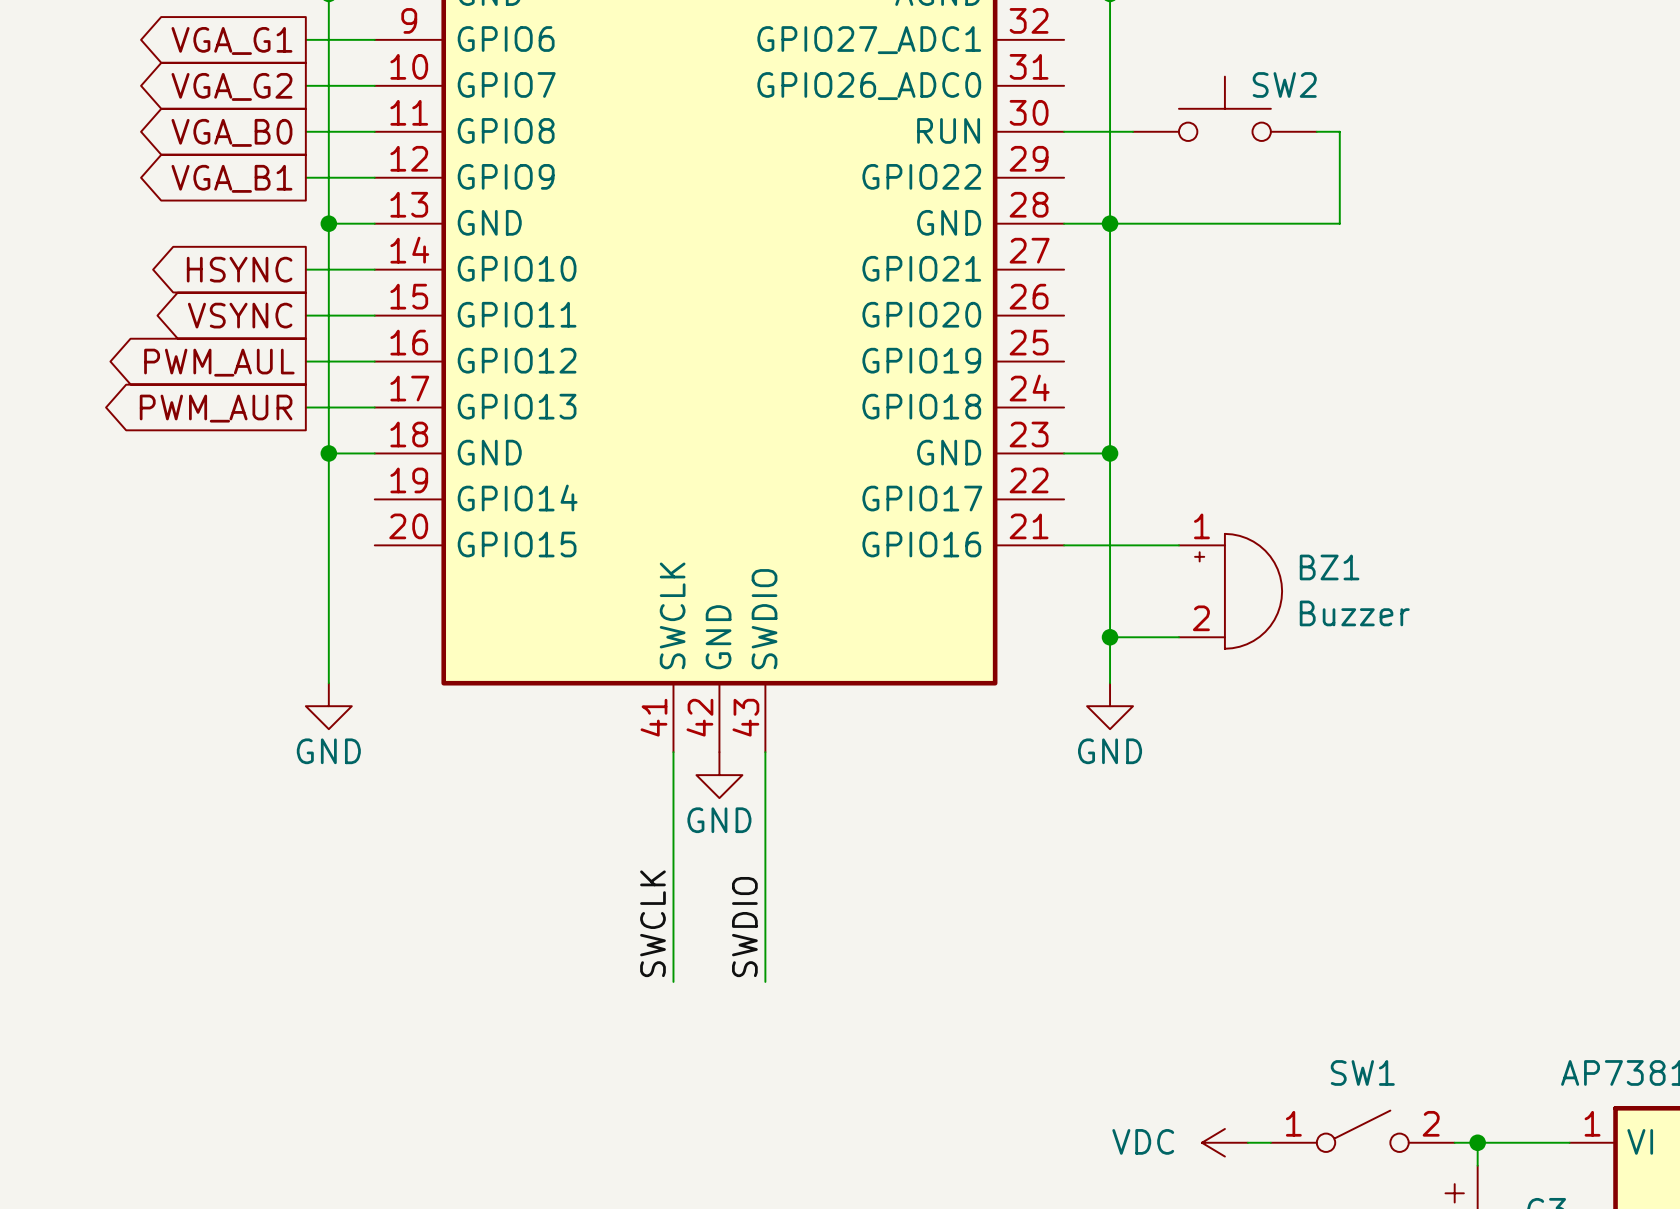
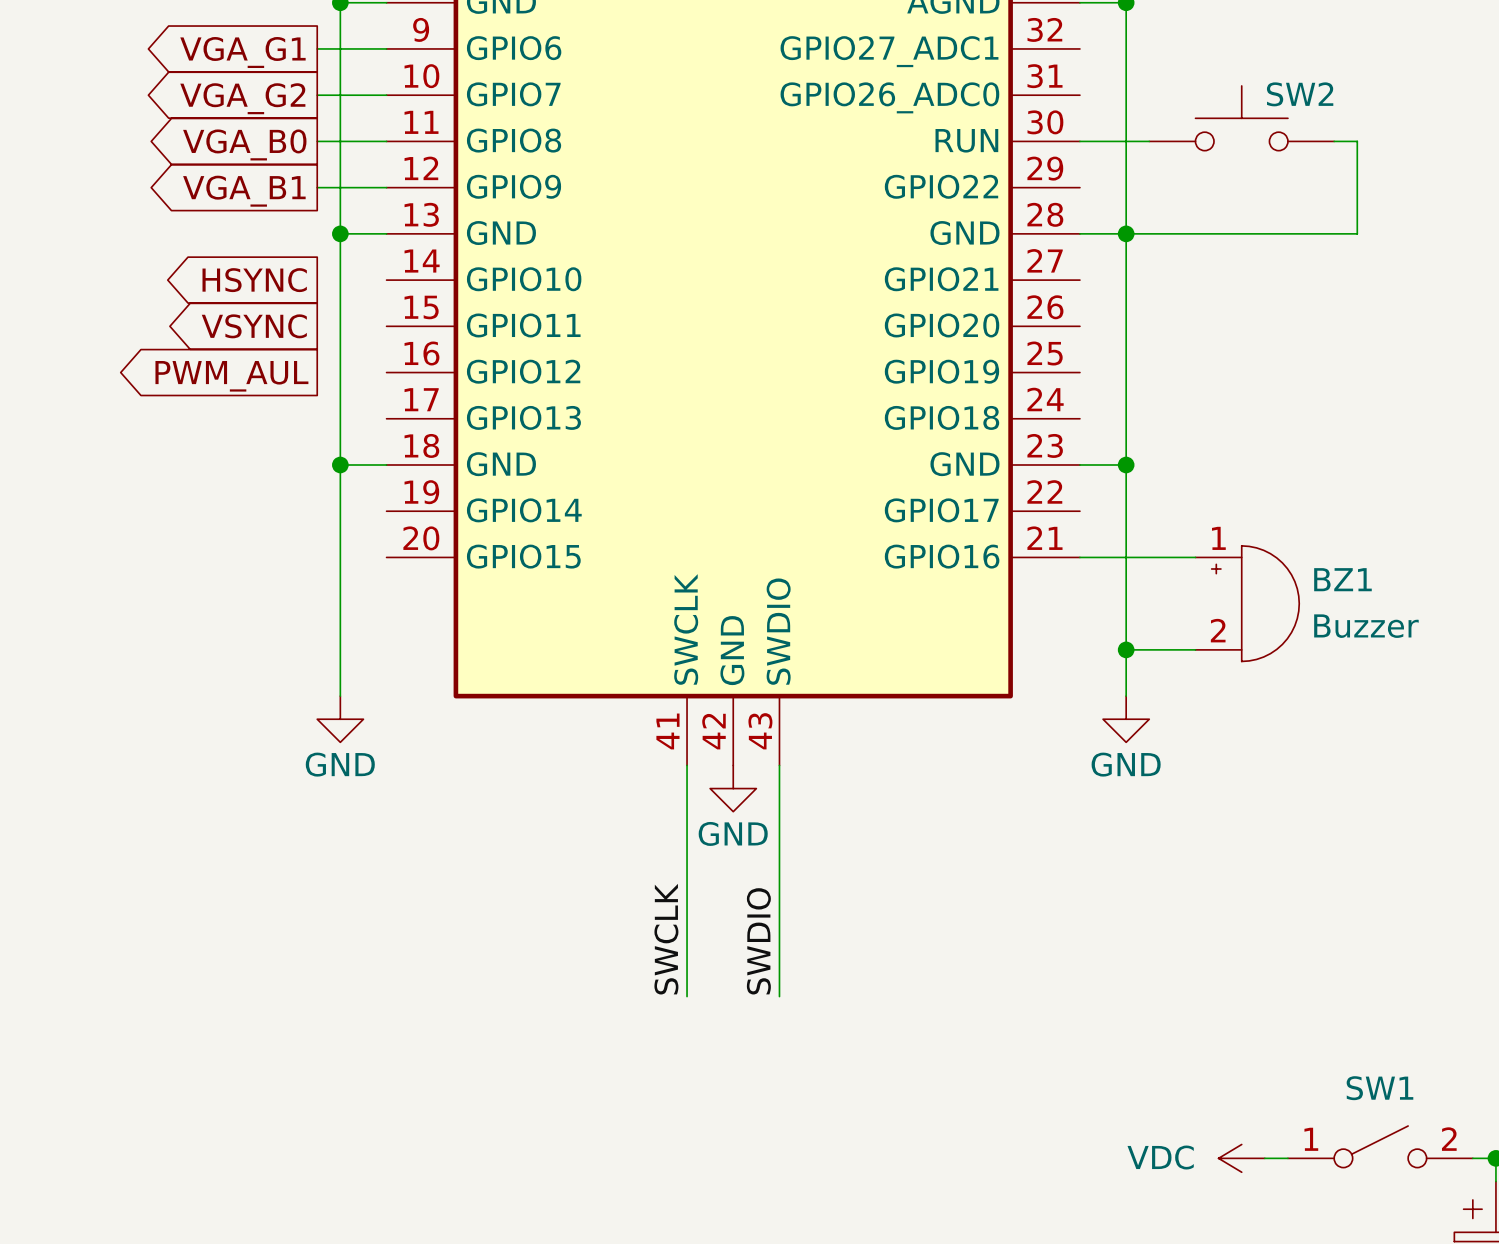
wire: (305, 269) (374, 269) -> none
wire: (305, 315) (374, 315) -> none
wire: (305, 361) (374, 361) -> none
wire: (305, 407) (374, 407) -> none
global label: PWM_AUR (216, 408) -> none

